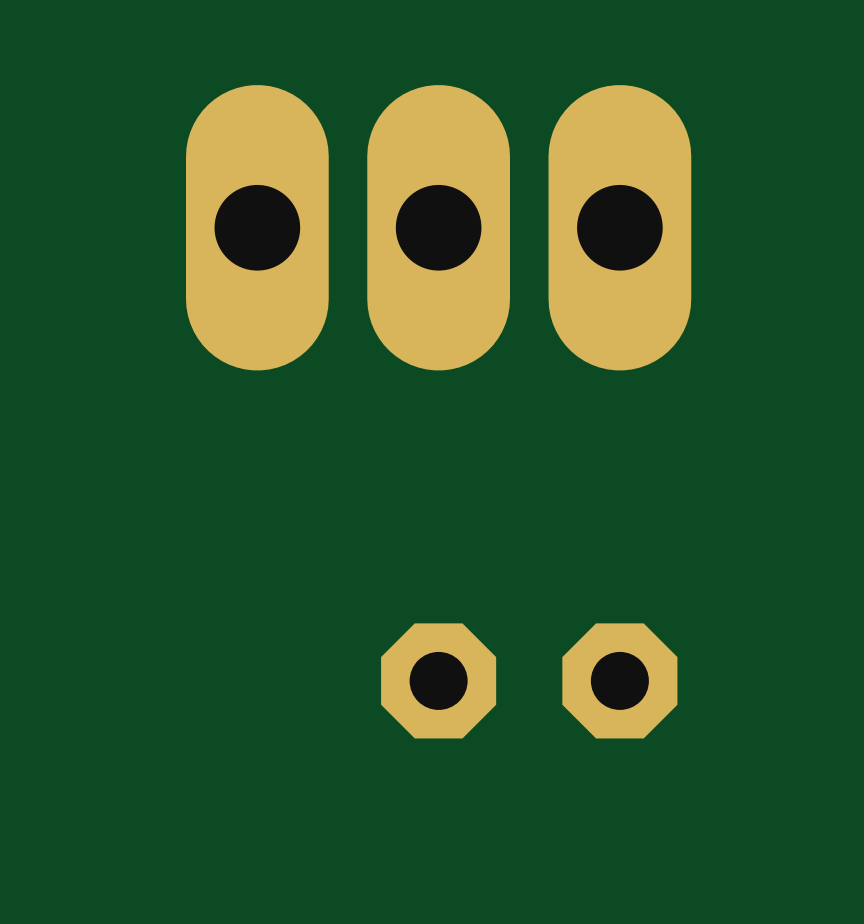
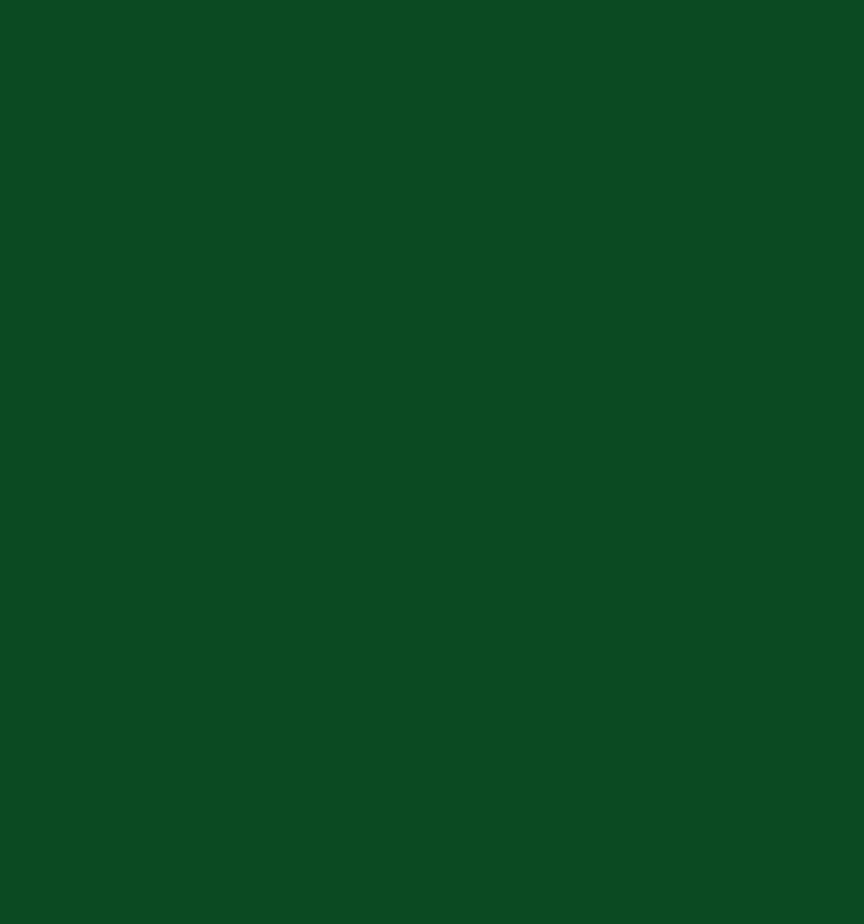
part: (438, 227) -> none
part: (529, 680) -> none

